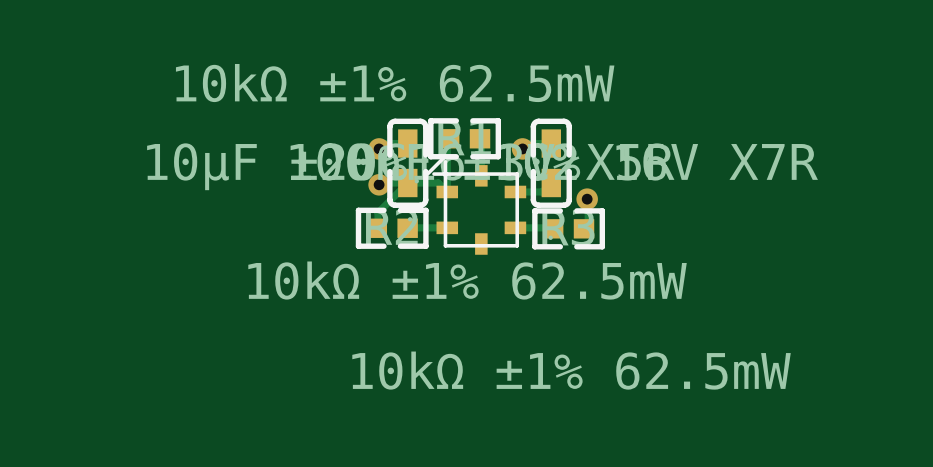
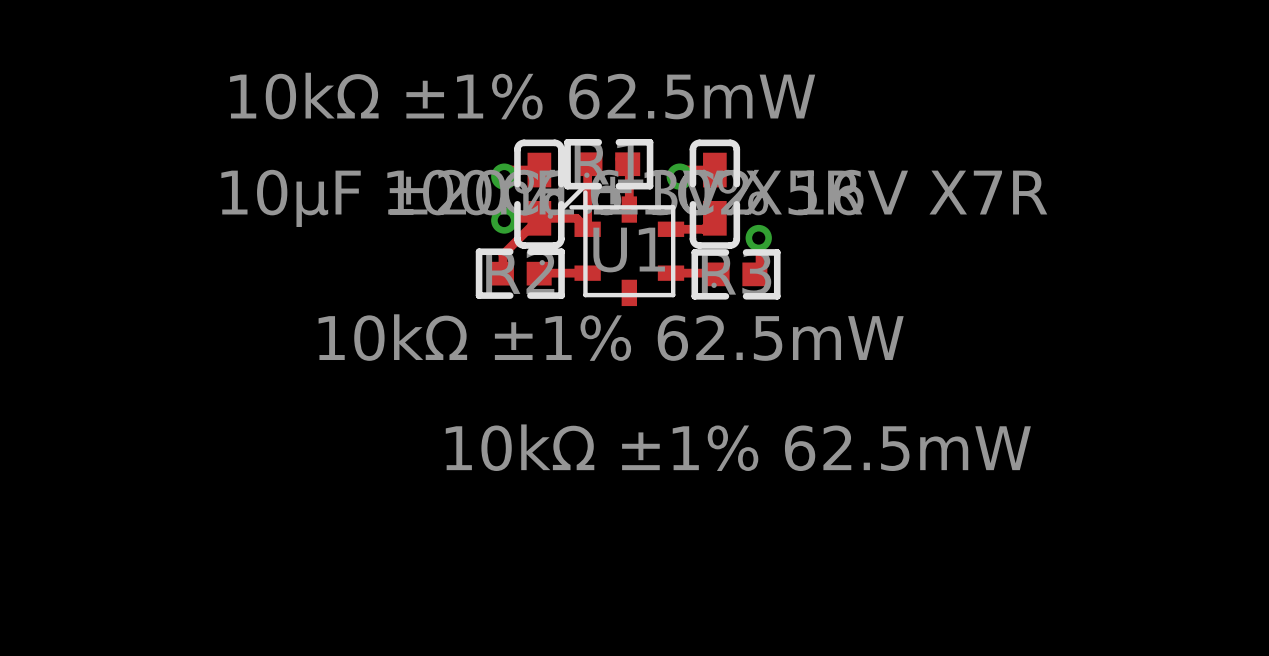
U1 name: none -> U1 (629, 250)

